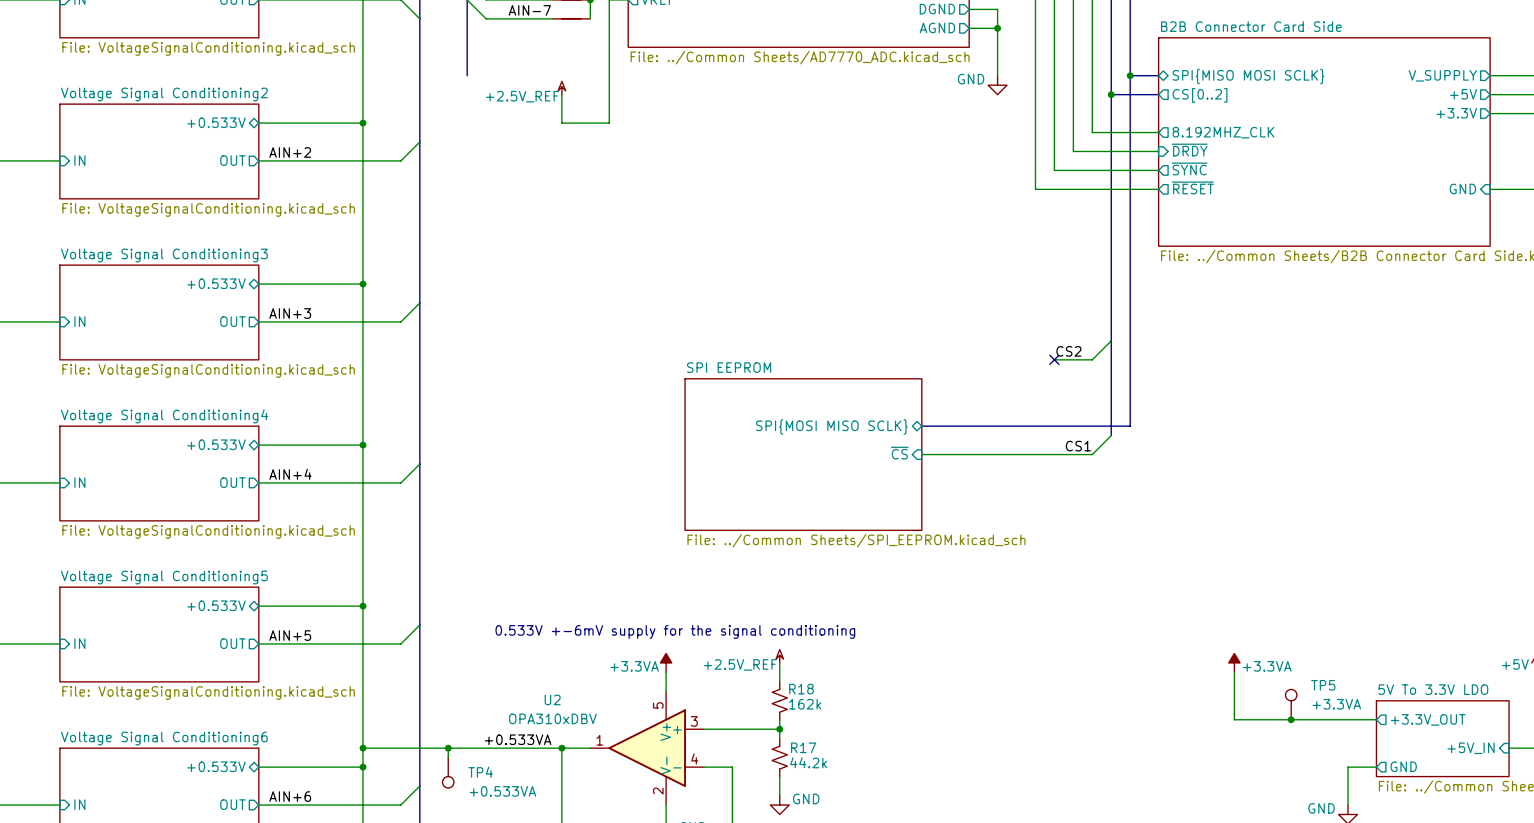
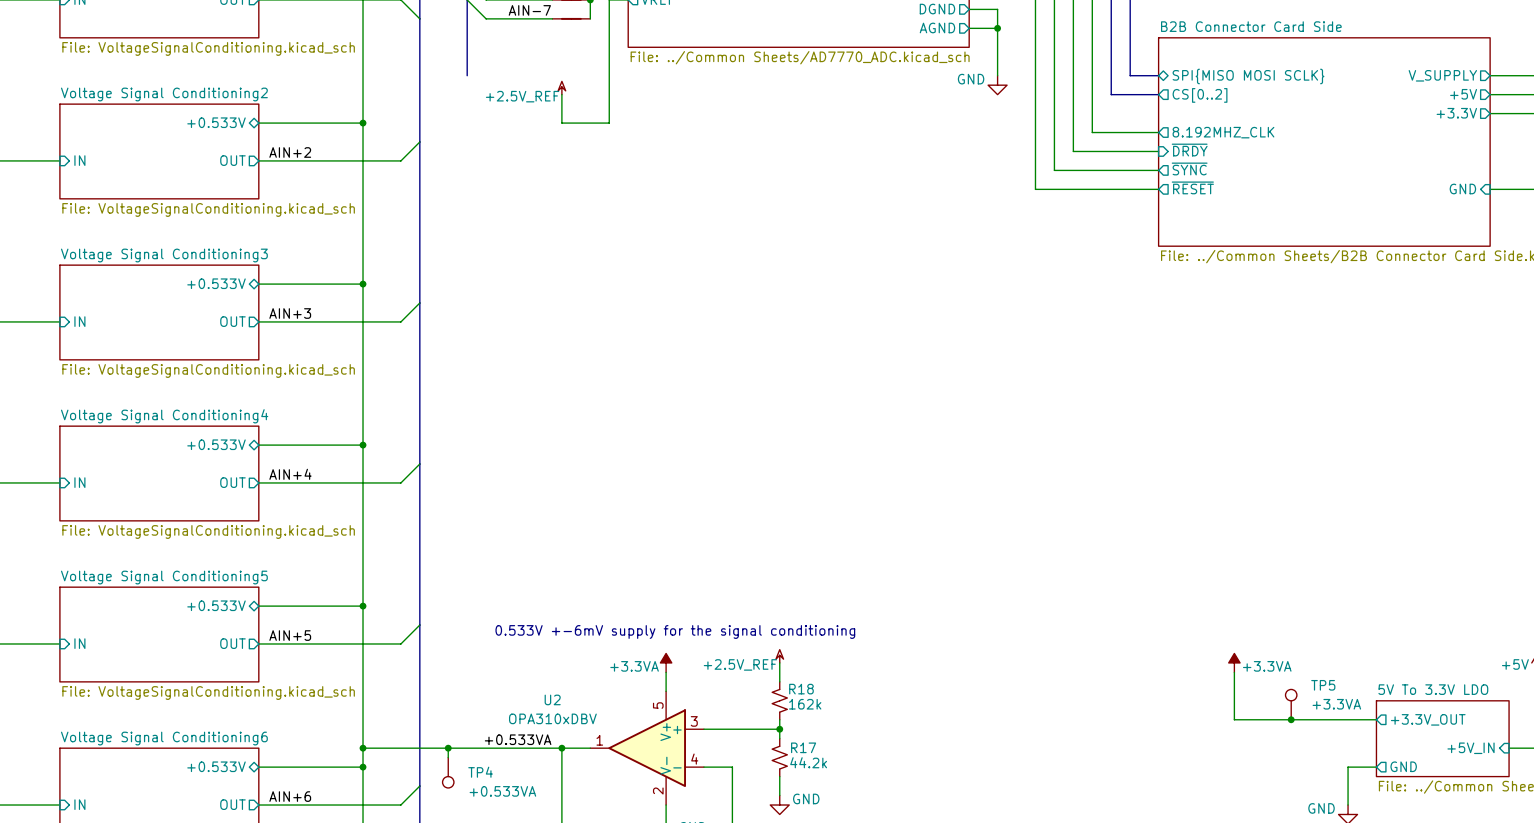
bus: (1130, 75) (1130, 426) (921, 426) -> none
junction: (1130, 75) -> none
bus: (1111, 94) (1111, 435) -> none
junction: (1111, 94) -> none
wire: (1111, 340) (1092, 359) (1054, 359) -> none
label: CS2 (1068, 351) -> none
no-connect mark: (1054, 359) -> none
sheet pin: SPI{MOSI MISO SCLK} (831, 426) -> none
wire: (1111, 435) (1092, 454) (921, 454) -> none
label: CS1 (1078, 446) -> none
sheet pin: ~{CS} (899, 453) -> none
sheet SPI EEPROM: File: ../Common Sheets/SPI_EEPROM.kicad_sch (803, 454) -> none

